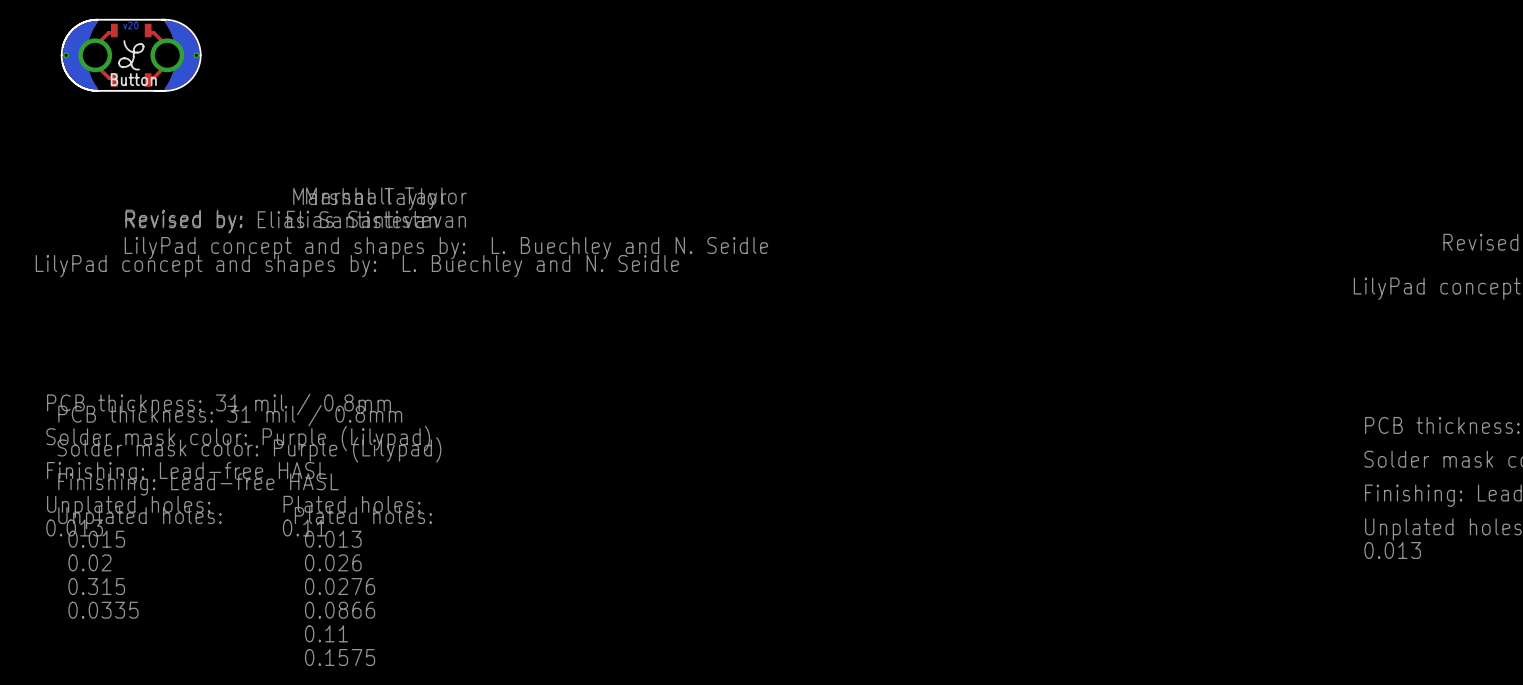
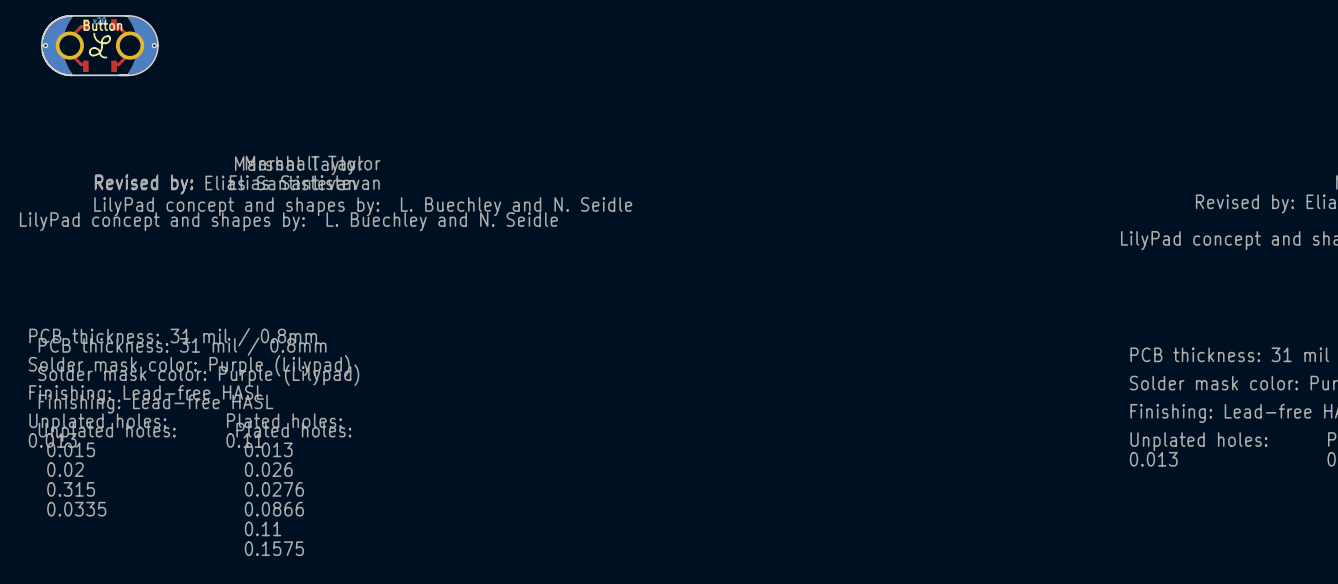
text position: Button (133, 79) -> Button (102, 25)

